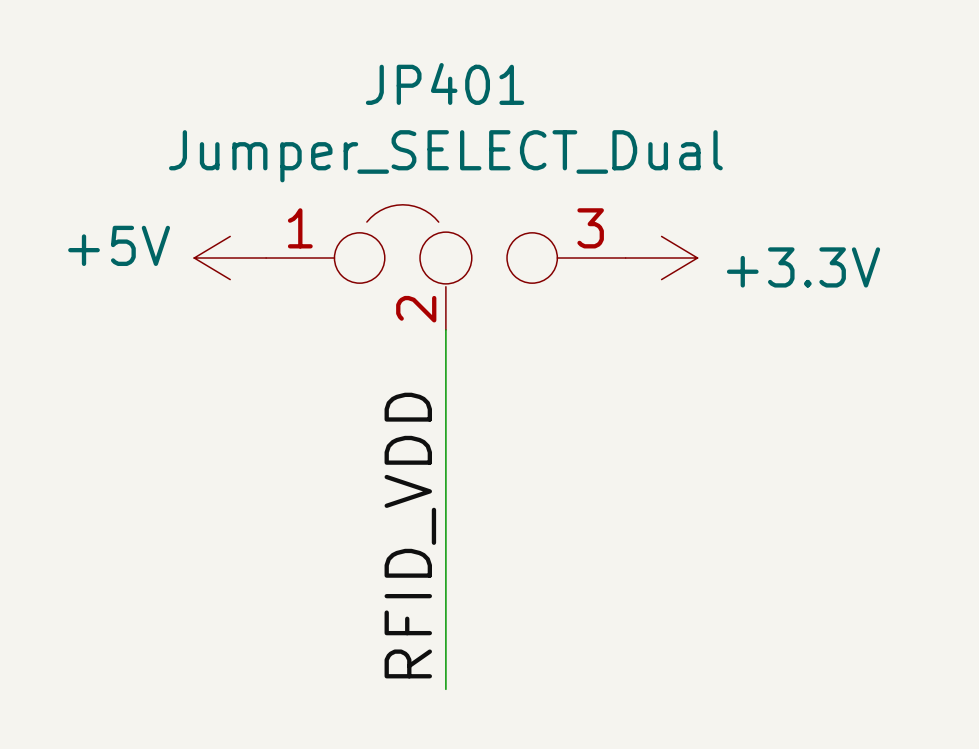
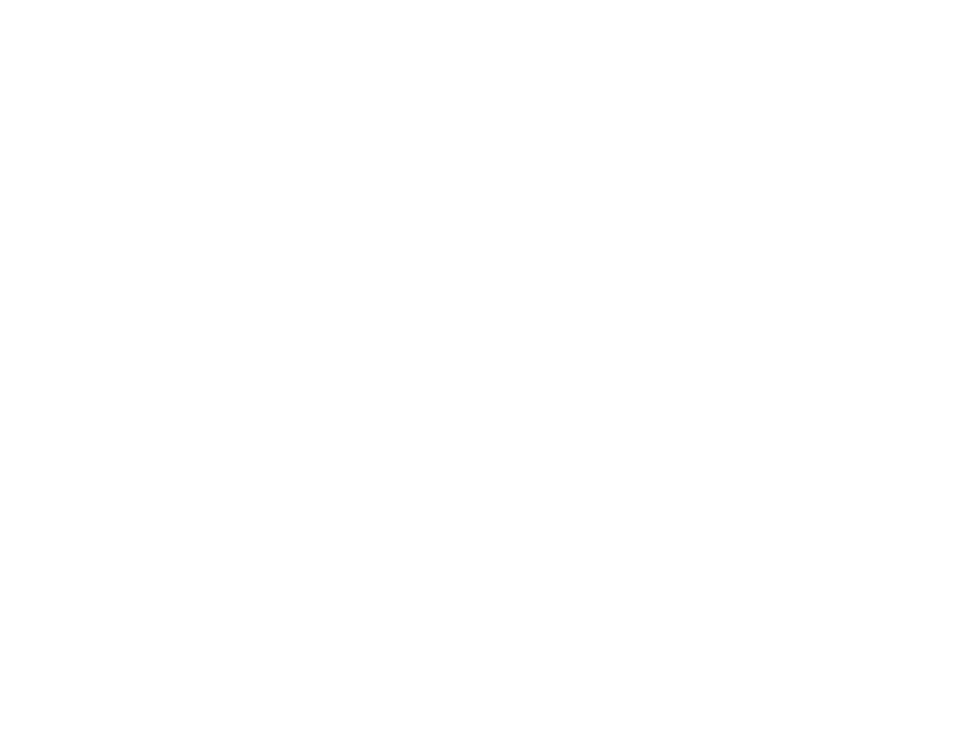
power symbol: +5V (230, 258) -> none
power symbol: +3.3V (661, 258) -> none
JP401: Jumper_SELECT_Dual (445, 267) -> none
wire: (445, 329) (445, 689) -> none
label: RFID_VDD (410, 535) -> none

